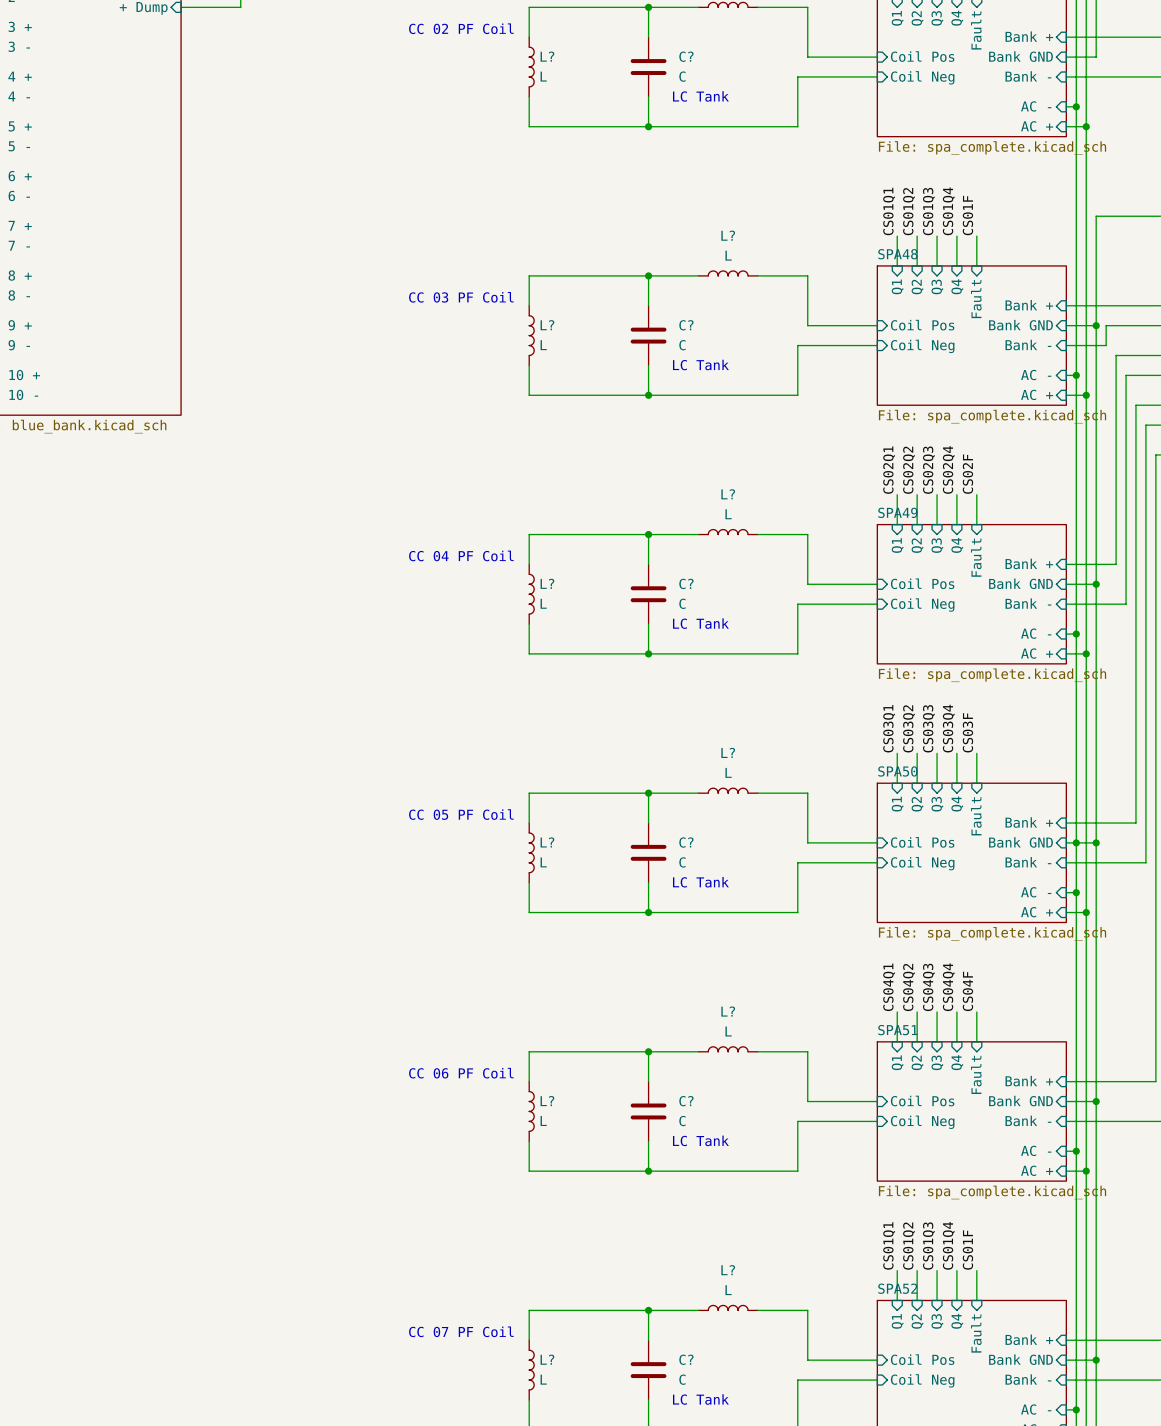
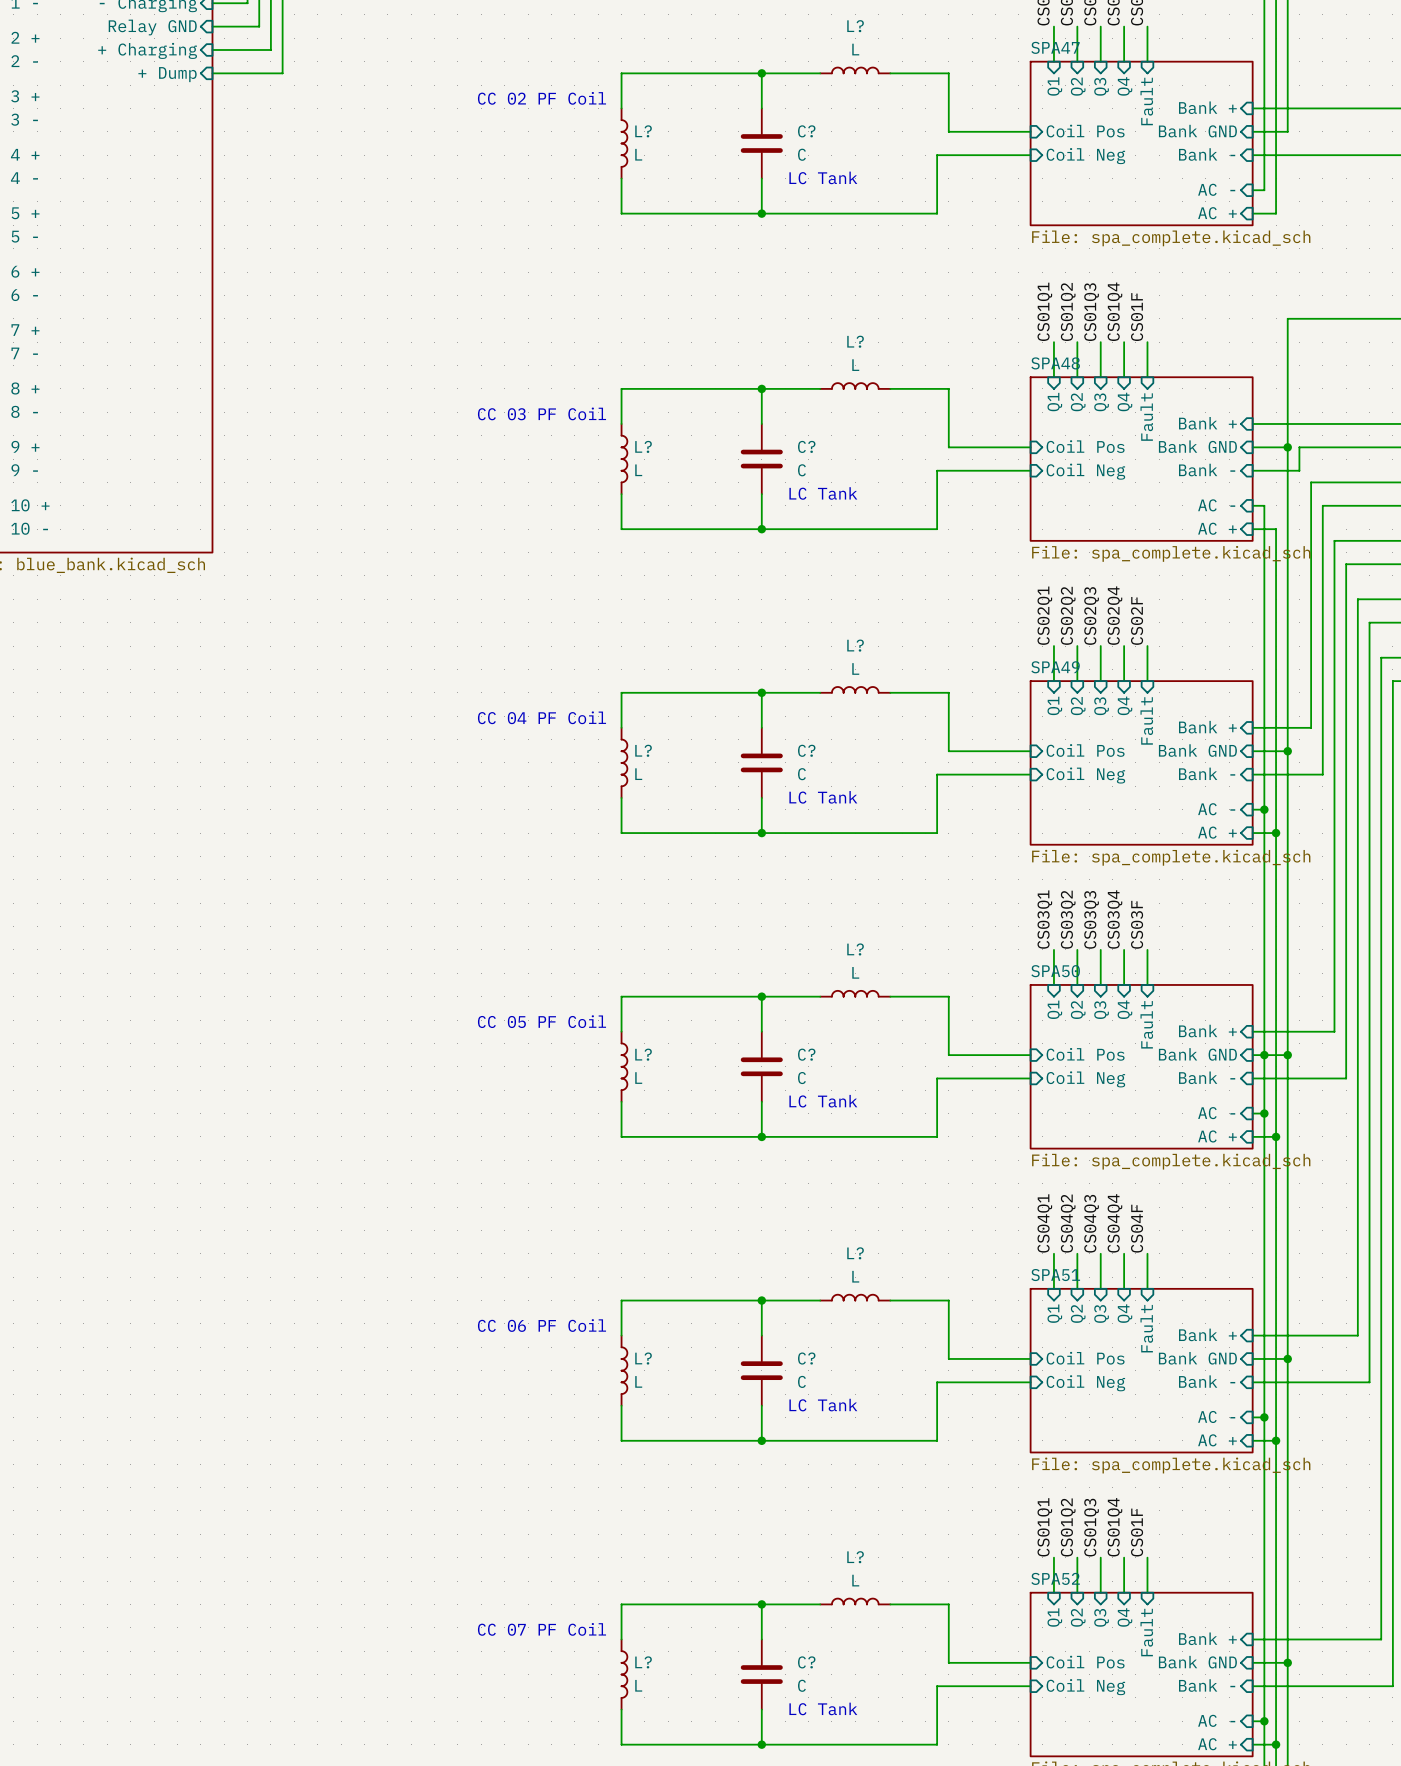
wire: (1076, 106) (1076, 375) -> none
junction: (1076, 106) -> none
wire: (1086, 126) (1086, 395) -> none
junction: (1086, 126) -> none
junction: (1076, 375) -> none
junction: (1086, 395) -> none

